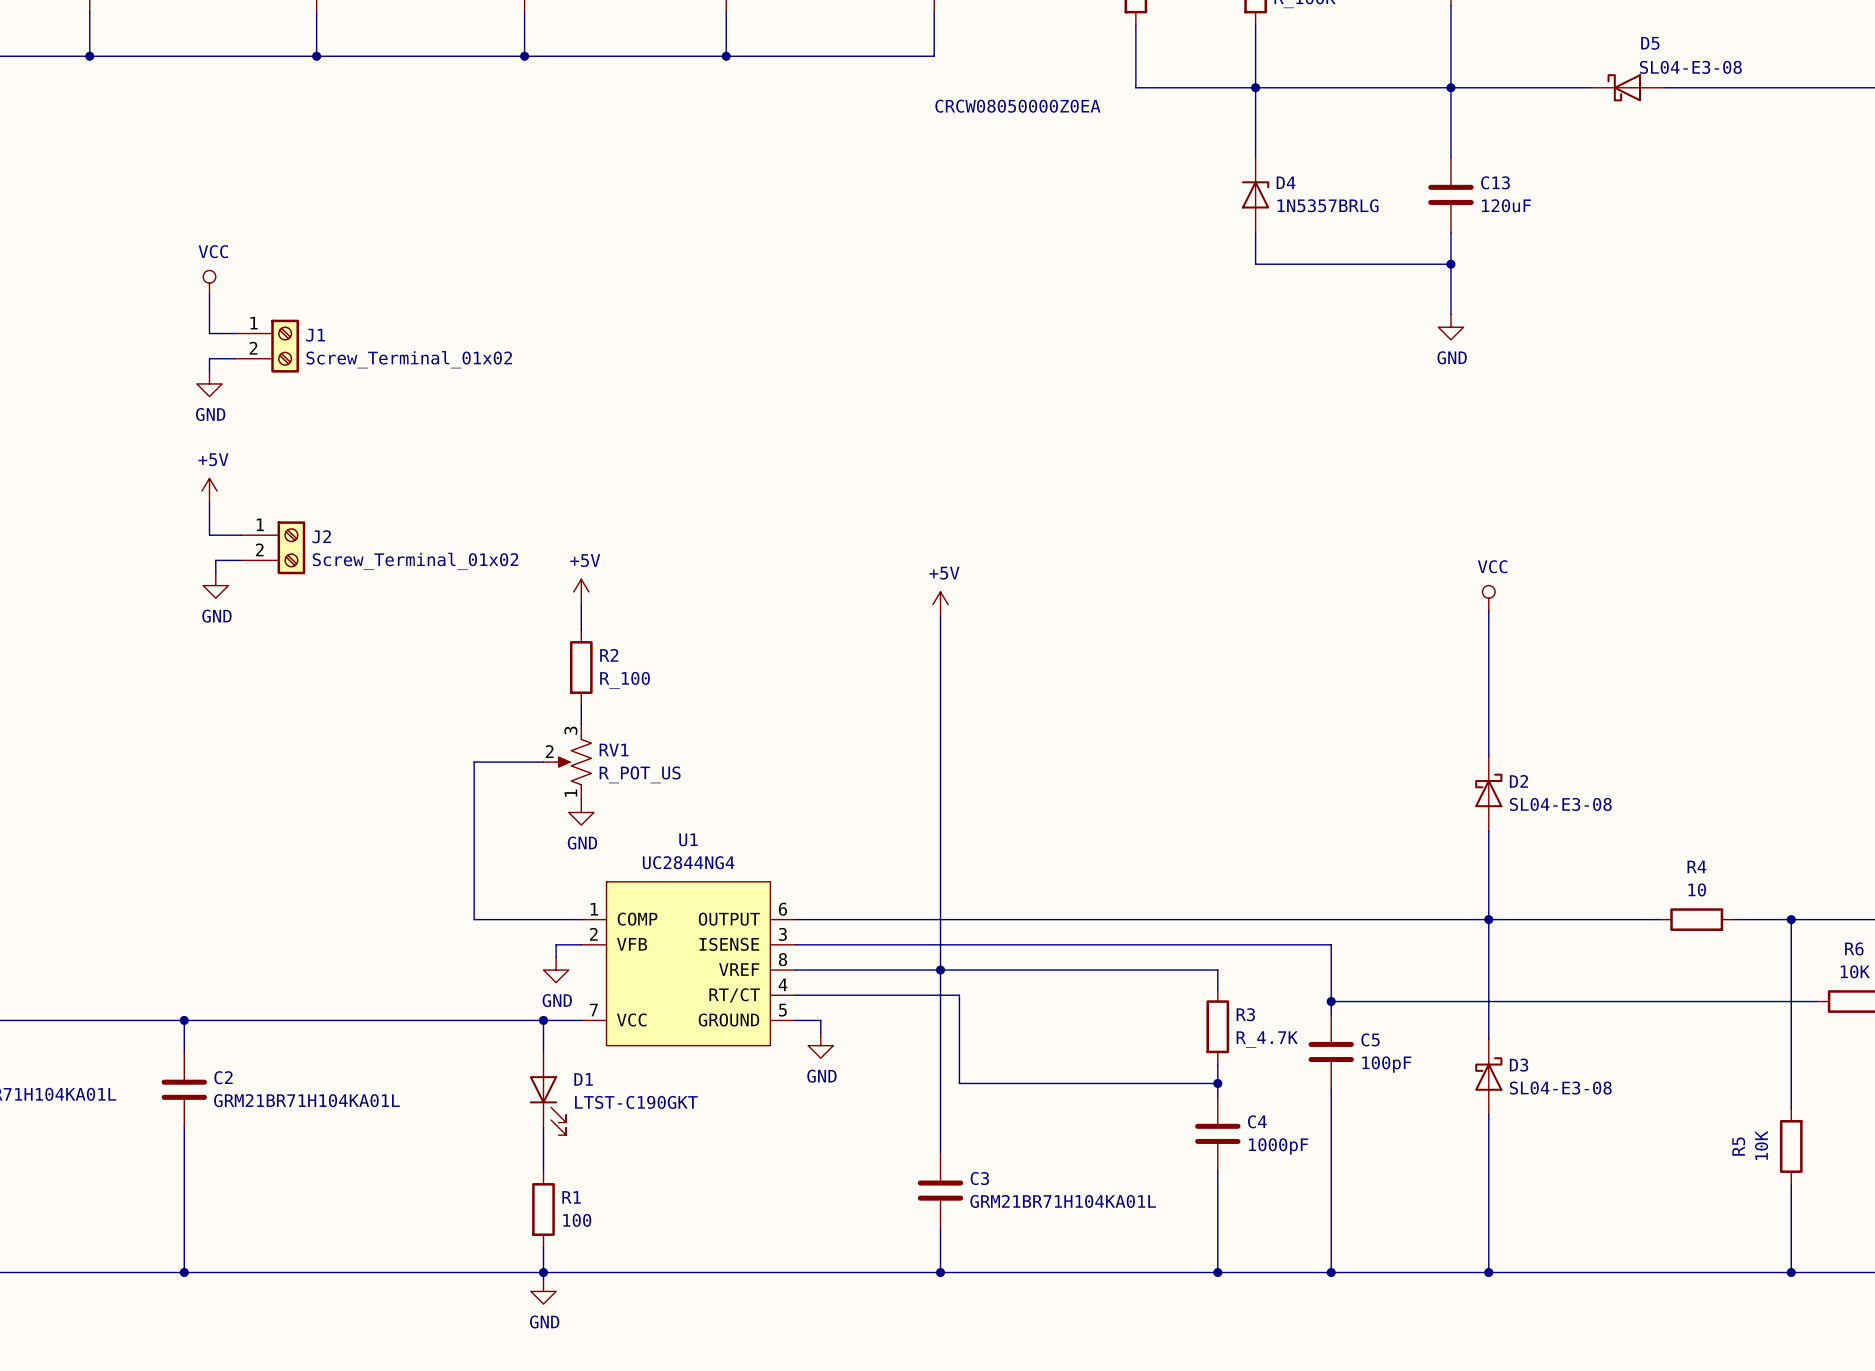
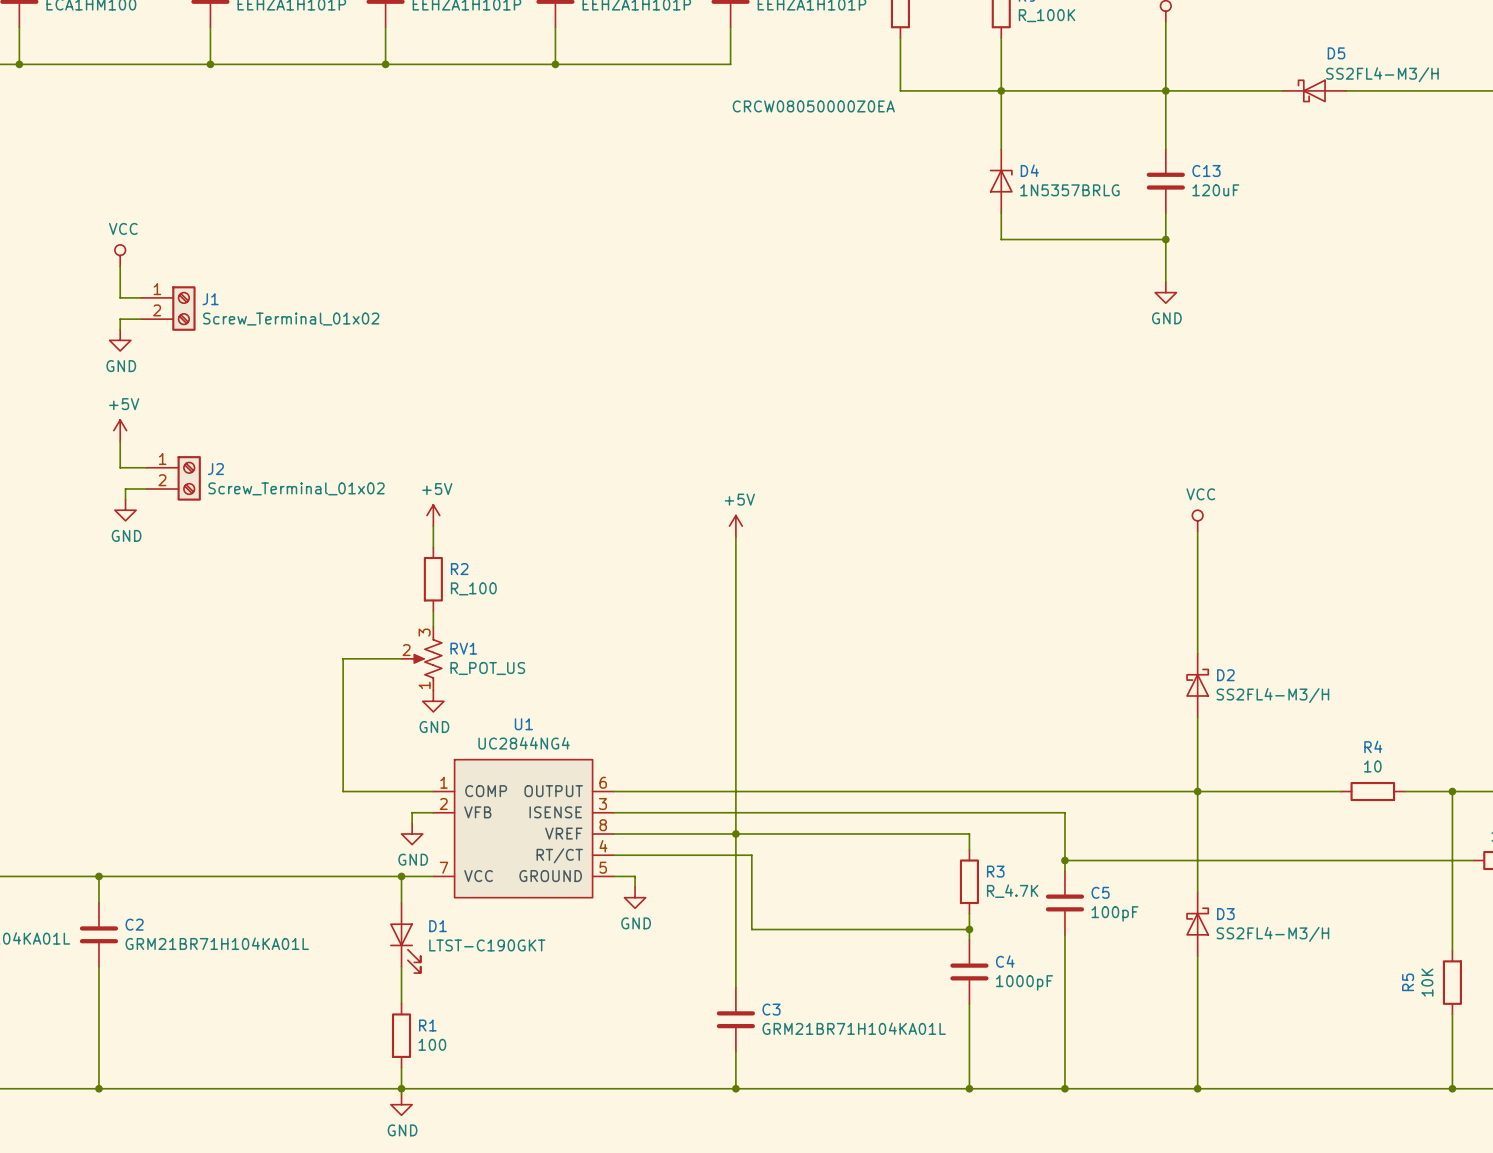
D5 value: SL04-E3-08 (1690, 67) -> SS2FL4-M3/H (1382, 74)
D2 value: SL04-E3-08 (1560, 804) -> SS2FL4-M3/H (1272, 695)
D3 value: SL04-E3-08 (1560, 1088) -> SS2FL4-M3/H (1272, 934)

